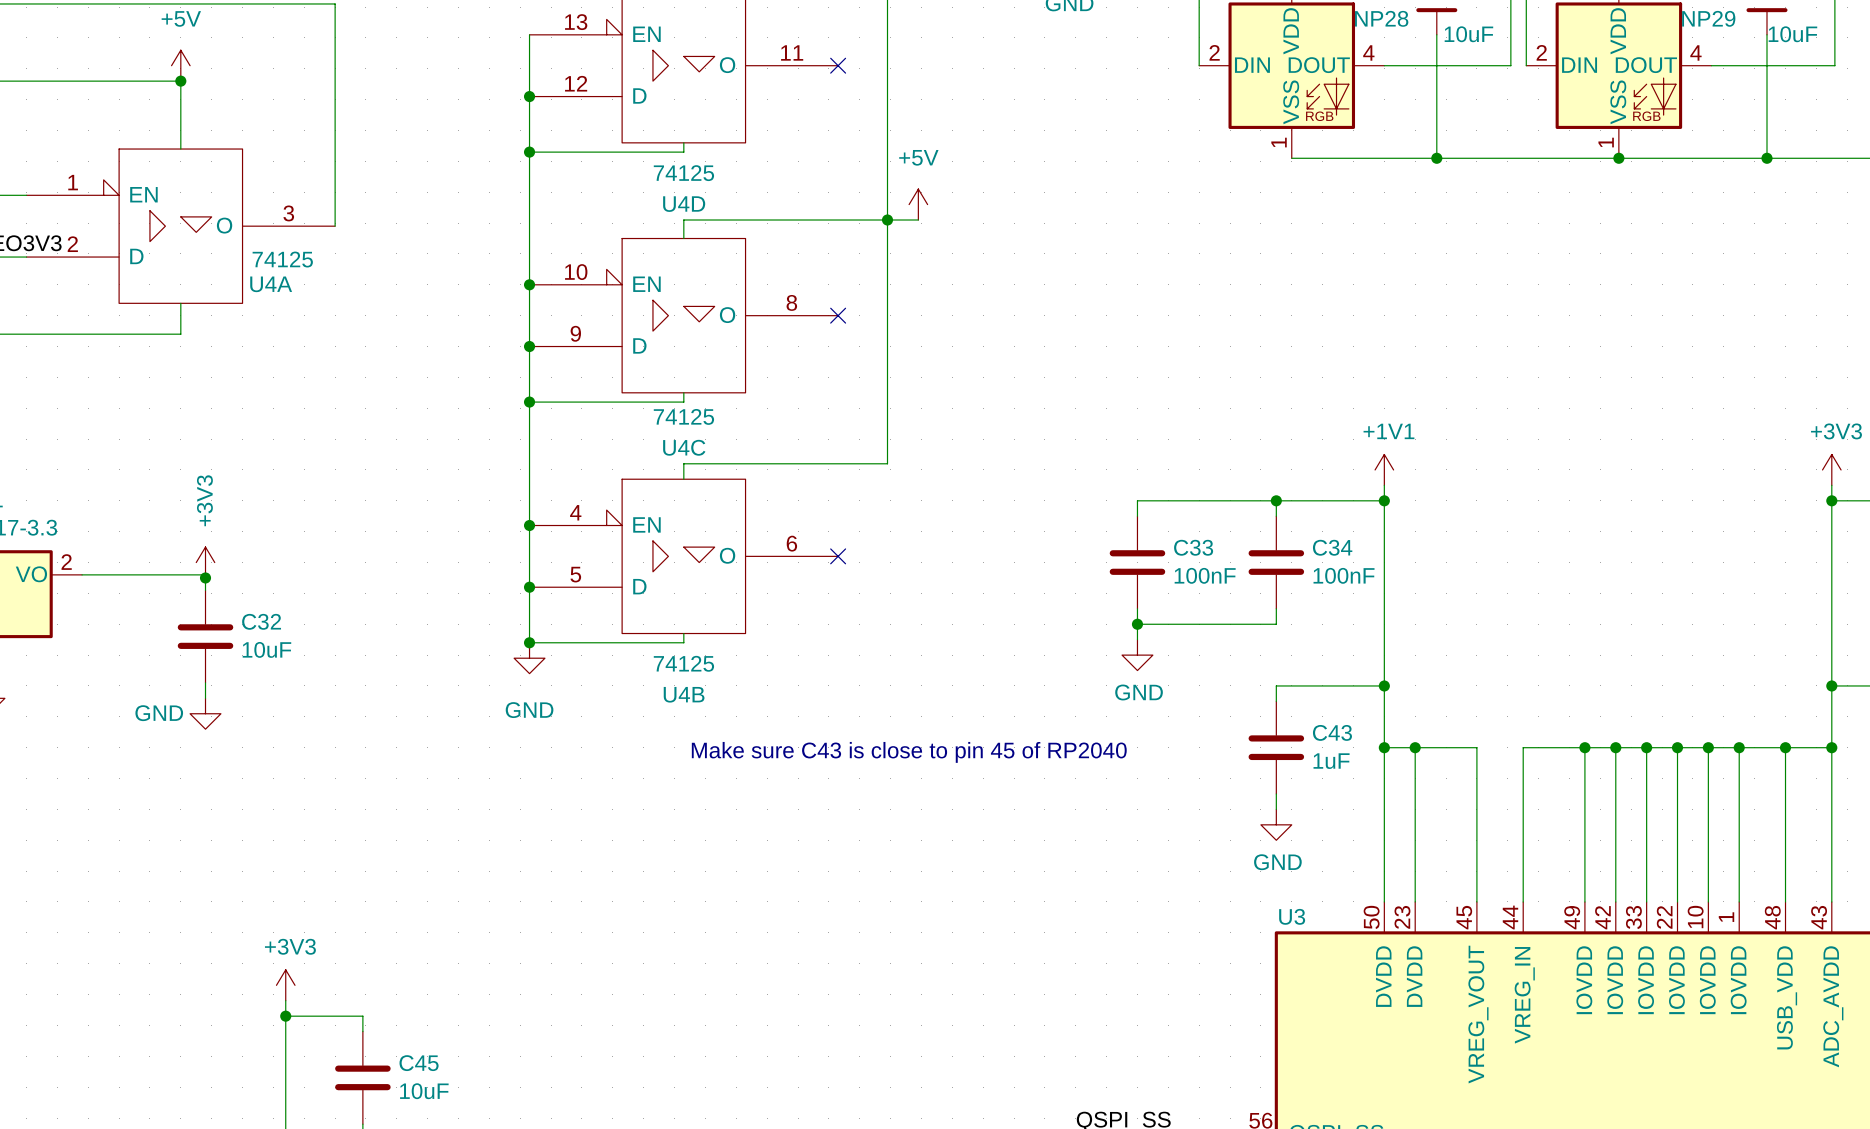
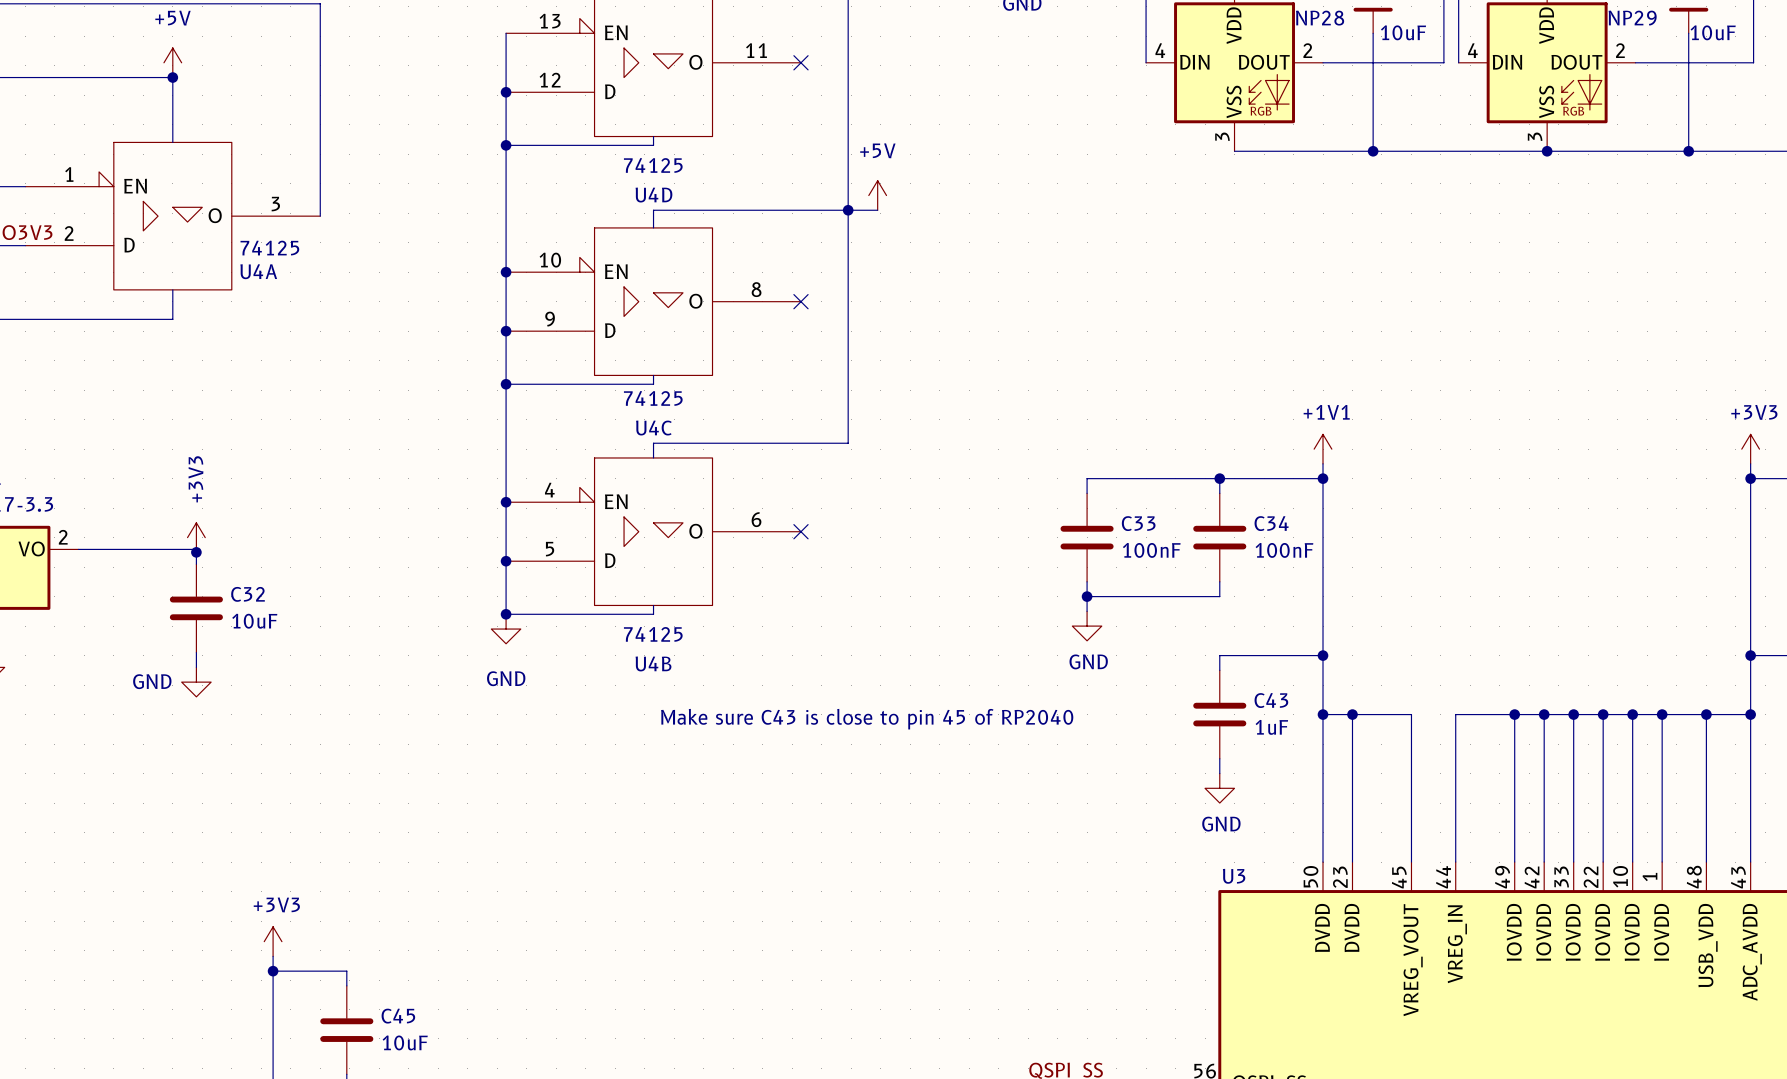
NP28 pin number: 2 (1214, 52) -> 4 (1160, 50)
NP28 pin number: 4 (1368, 52) -> 2 (1307, 50)
NP29 pin number: 2 (1541, 52) -> 4 (1472, 50)
NP29 pin number: 4 (1695, 52) -> 2 (1620, 50)
NP28 pin number: 1 (1279, 142) -> 3 (1222, 136)
NP29 pin number: 1 (1606, 142) -> 3 (1535, 136)

